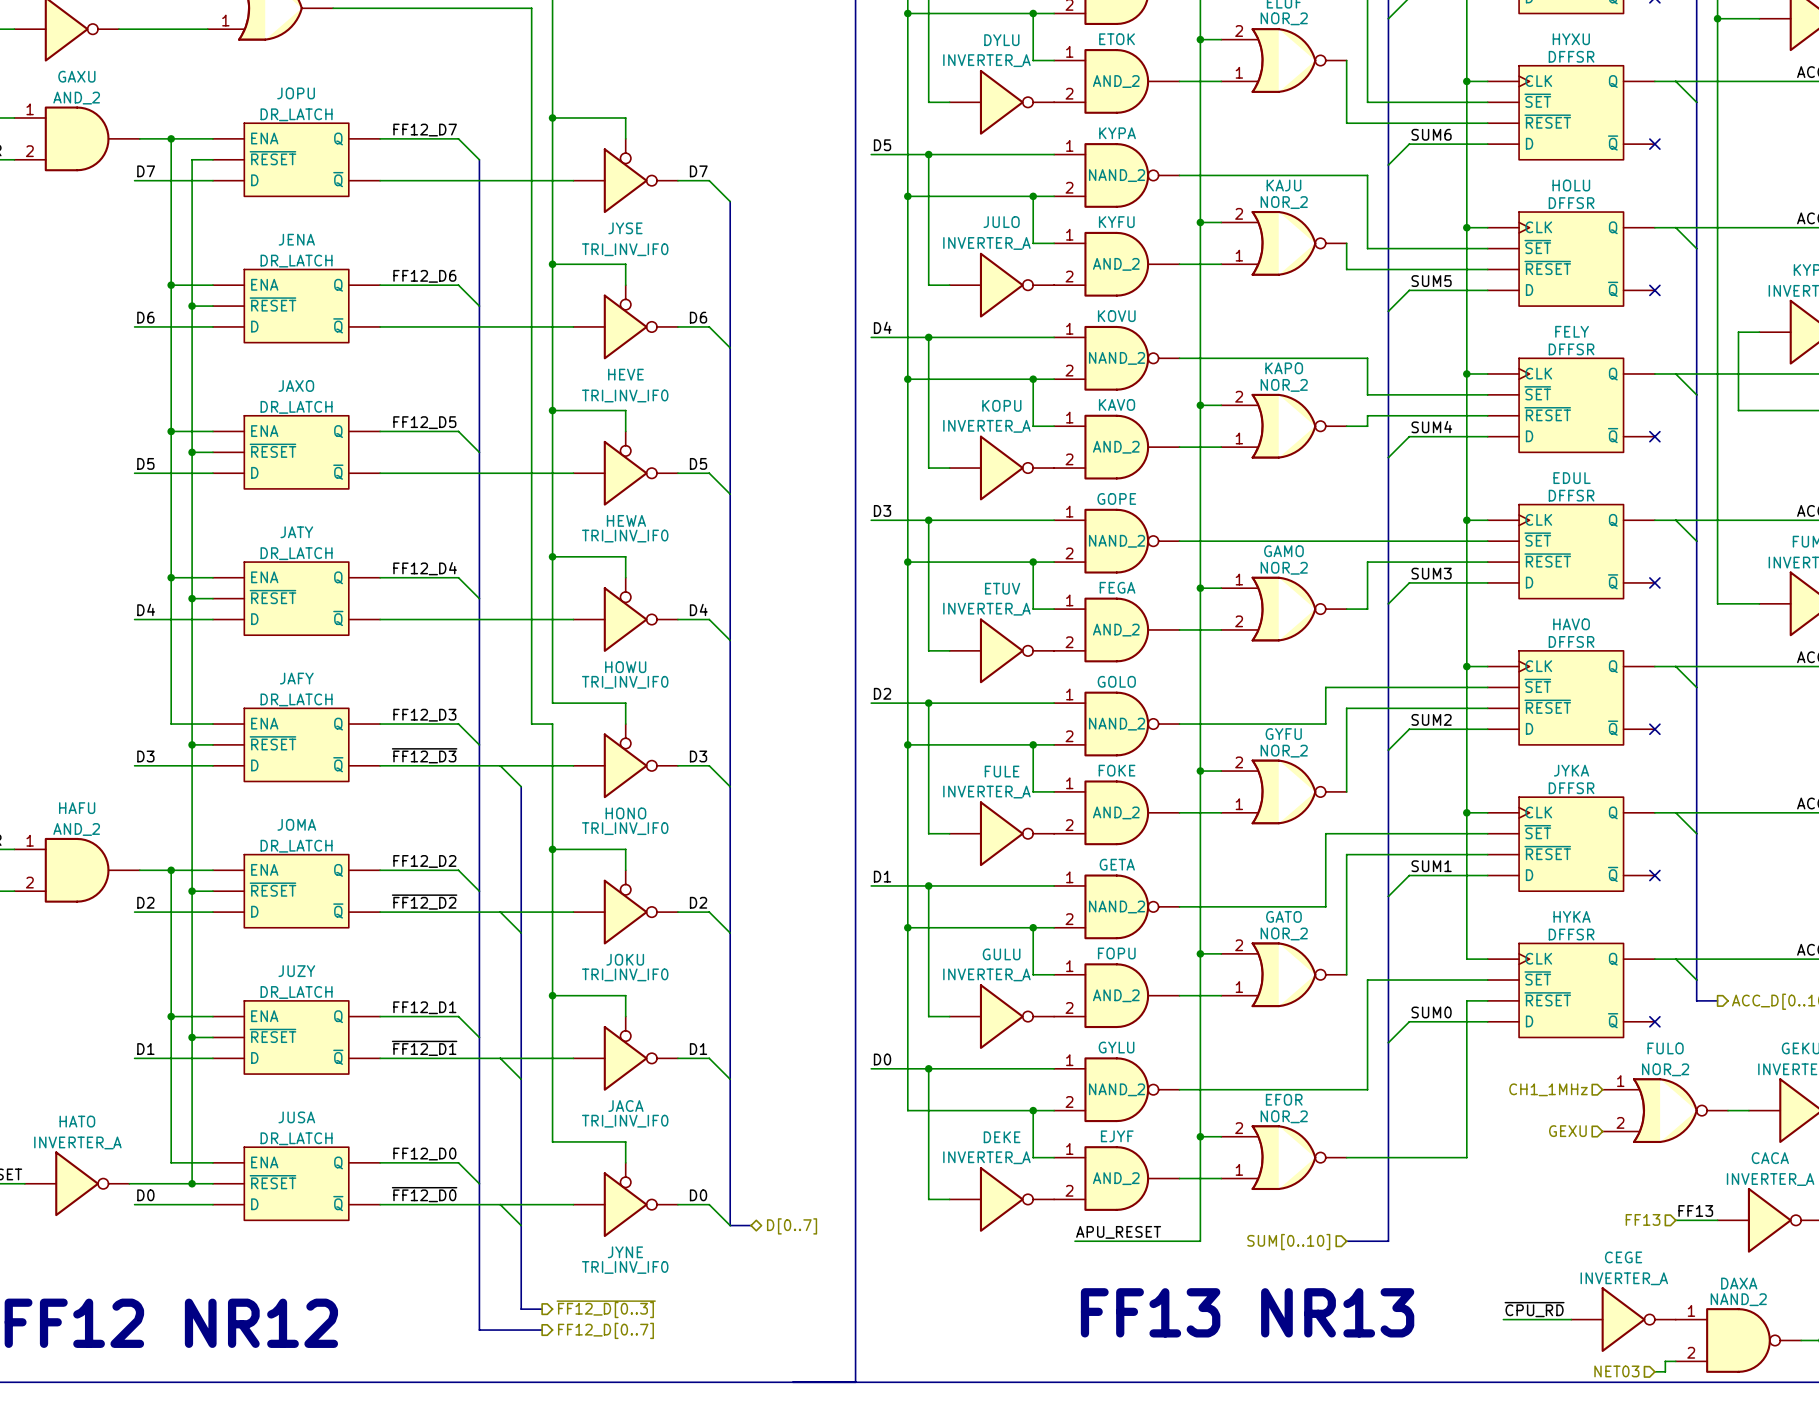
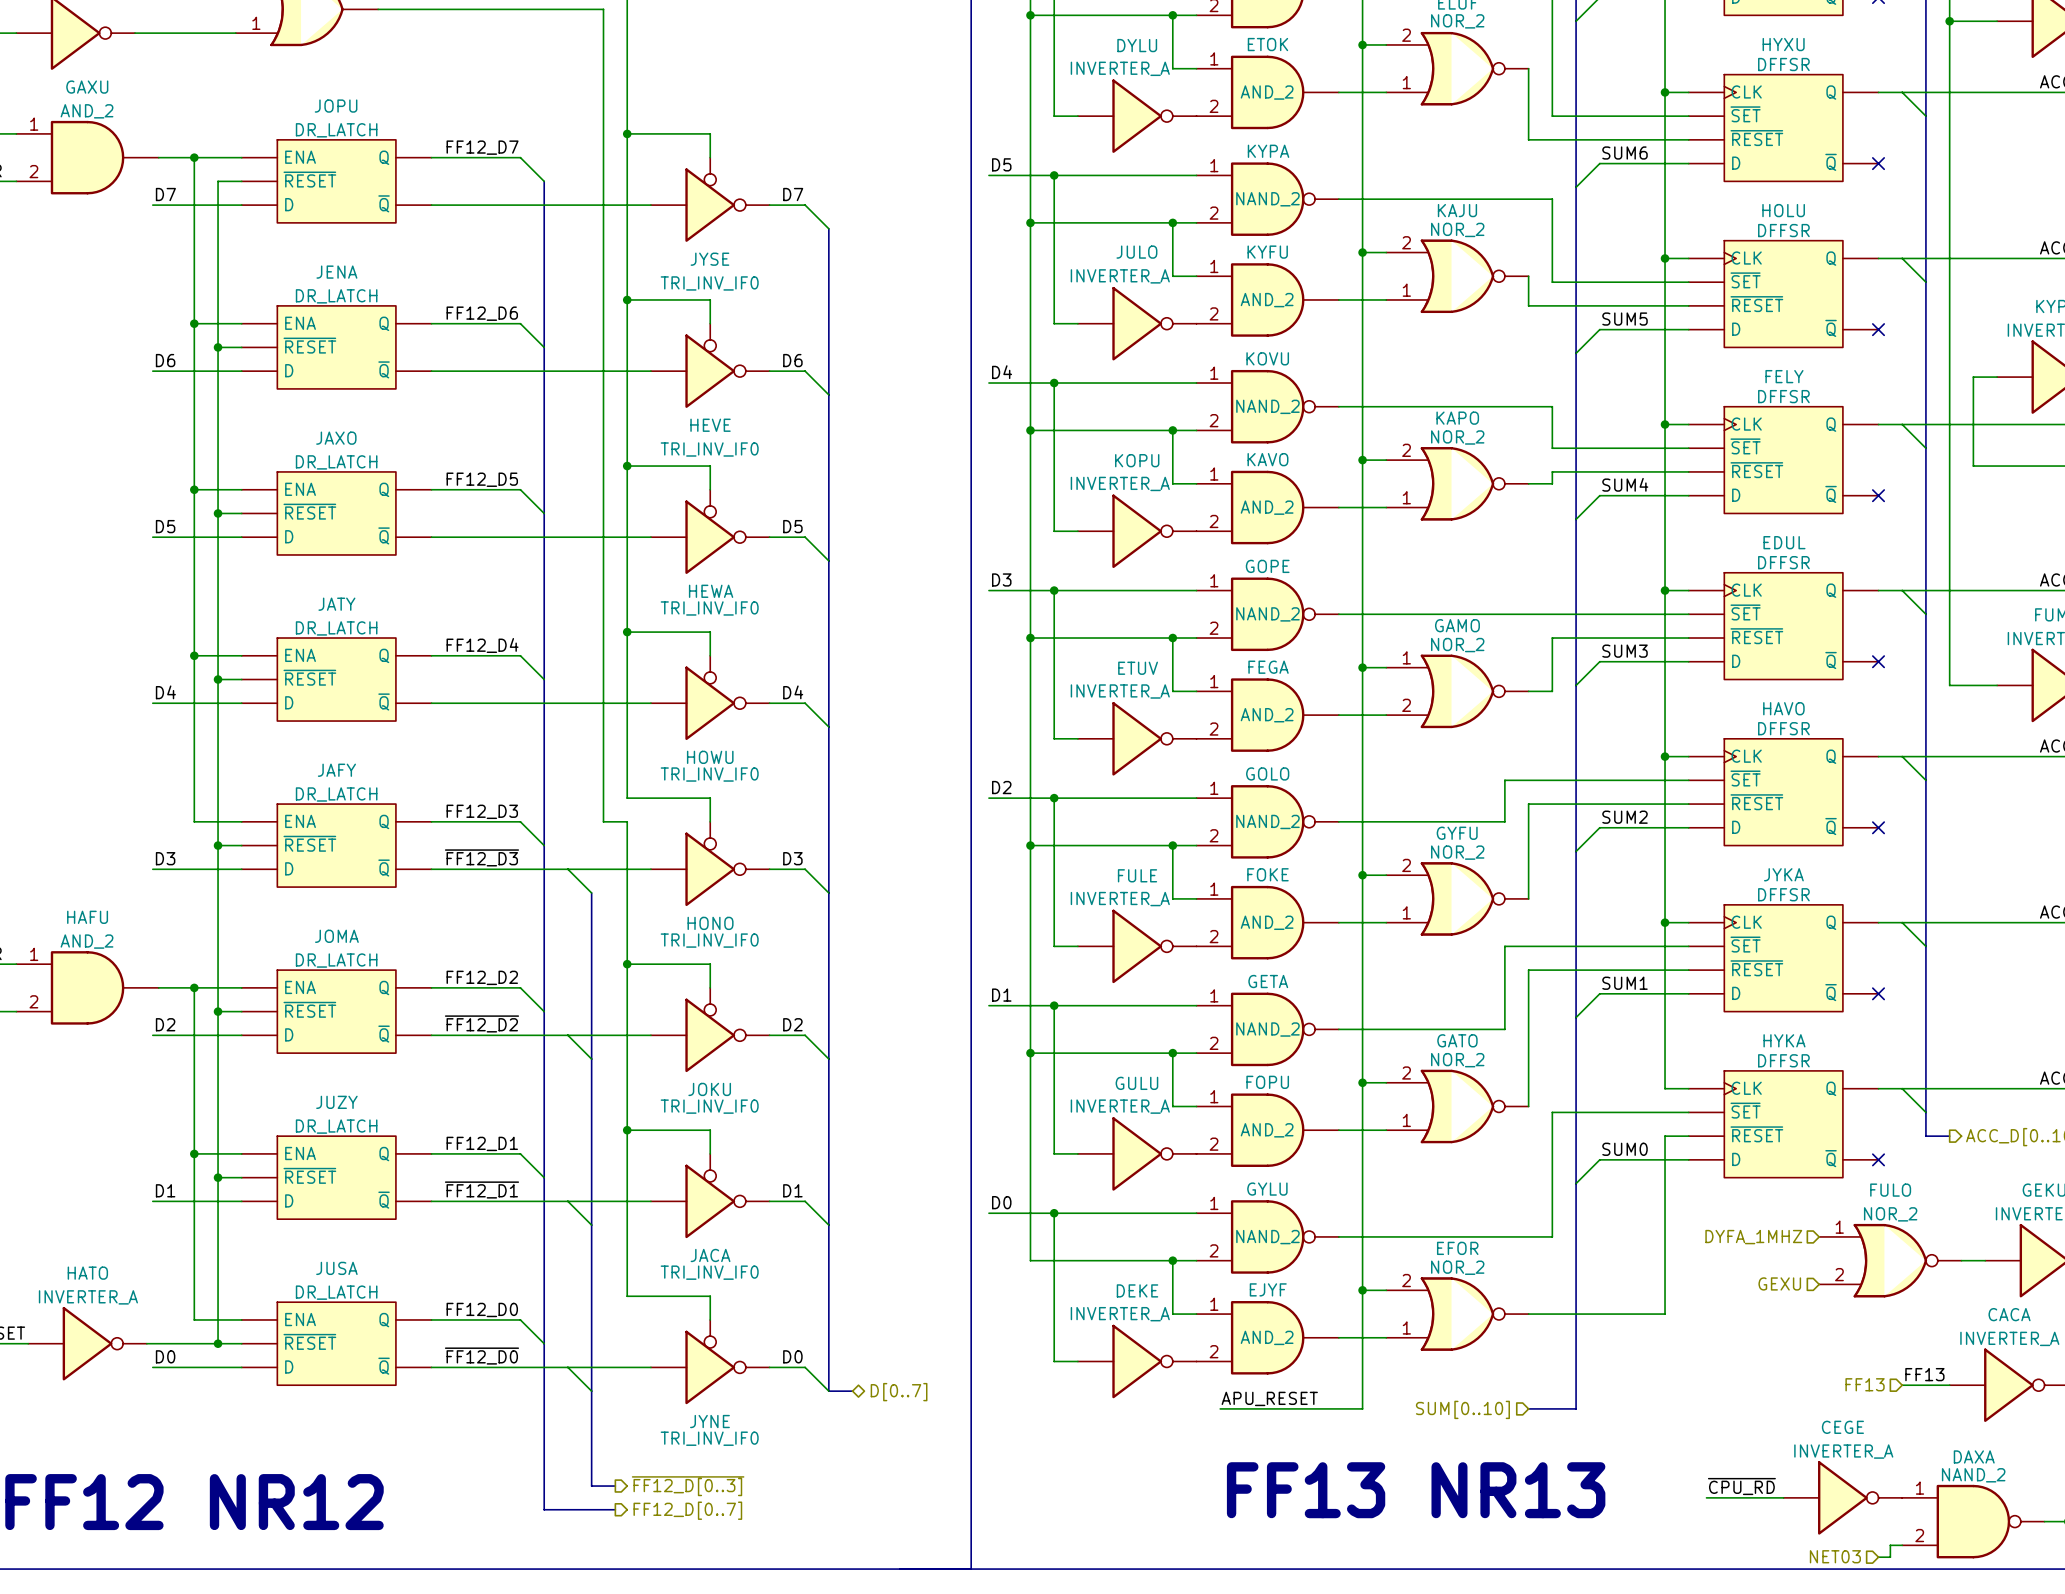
hierarchical label: CH1_1MHz (1548, 1089) -> DYFA_1MHZ (1753, 1237)

